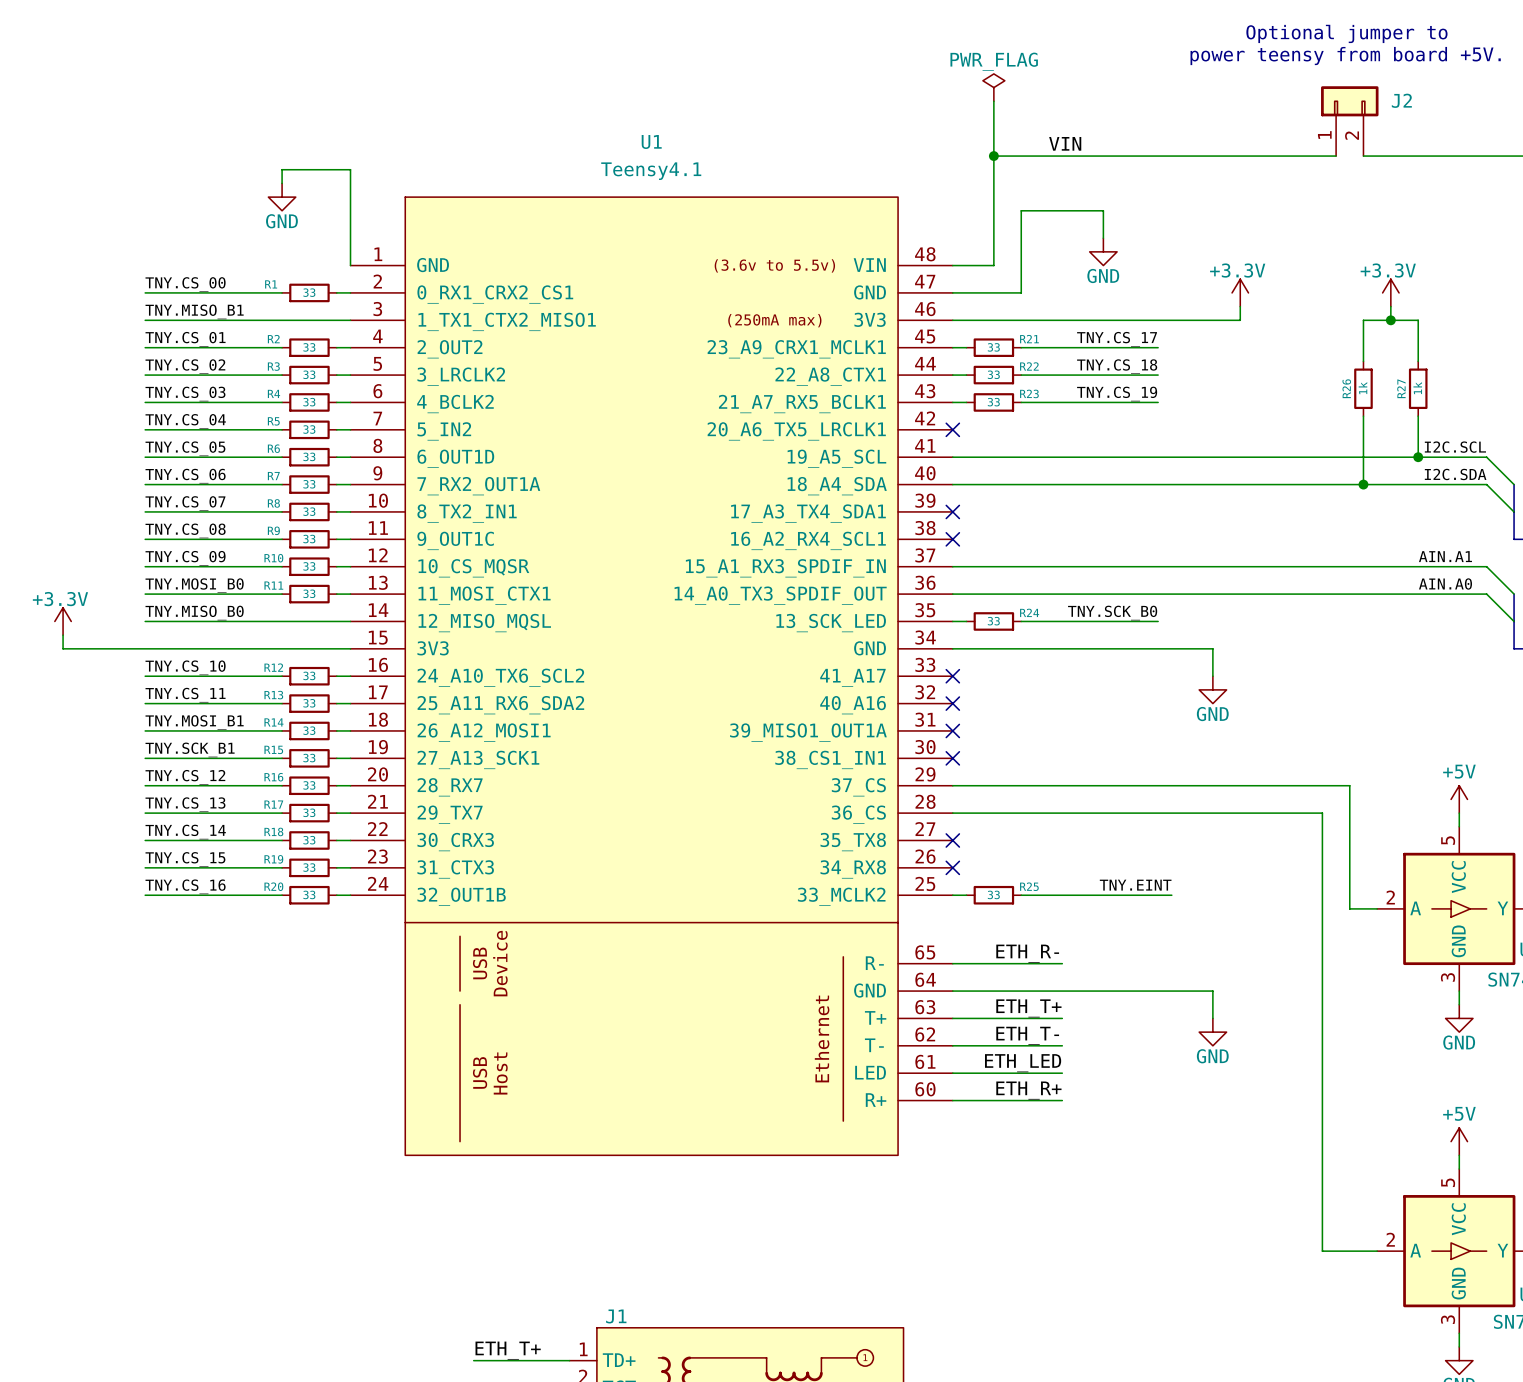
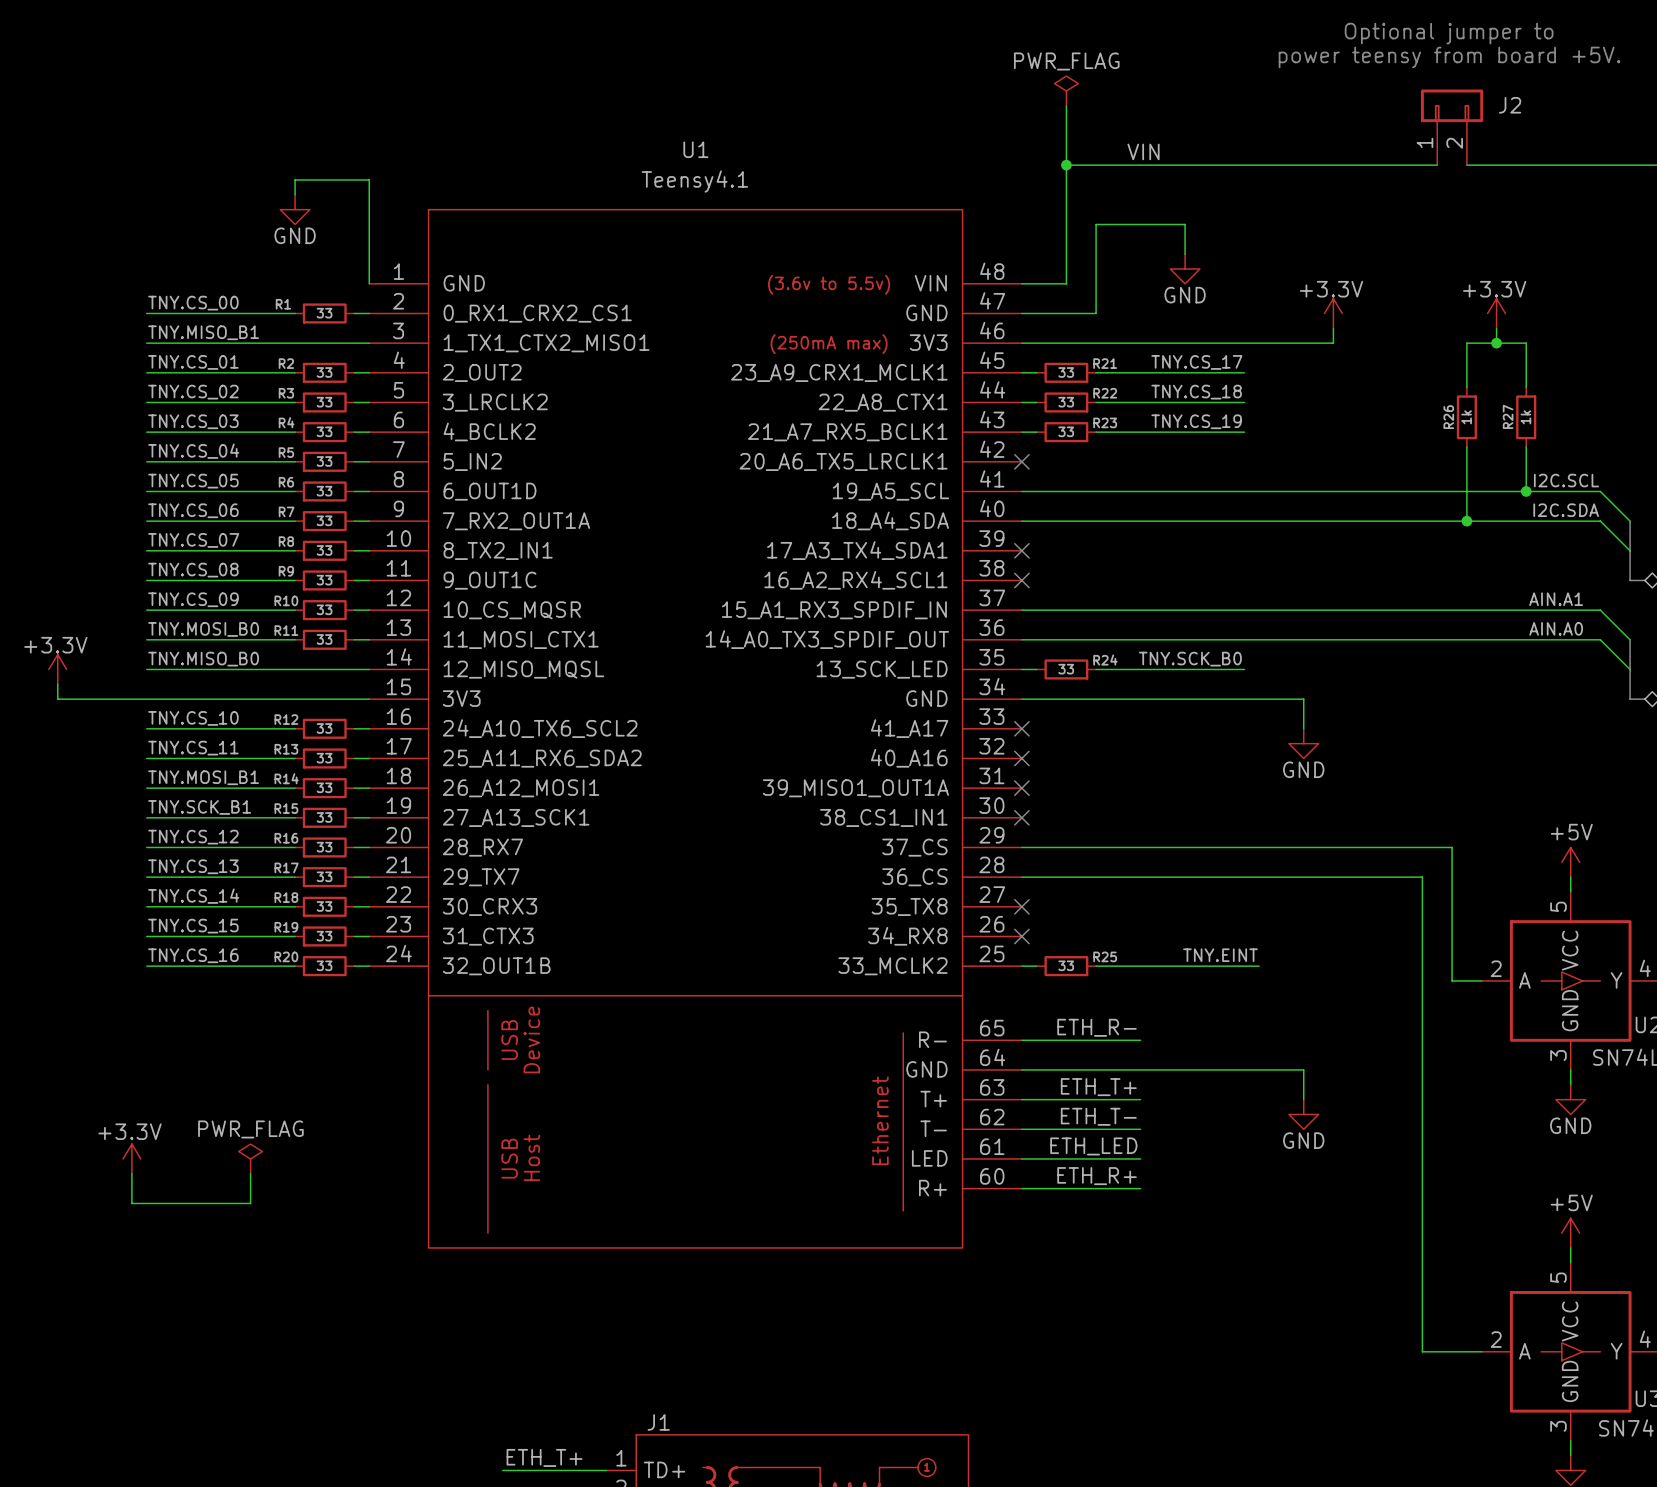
power symbol: none -> +3.3V (131, 1158)
power symbol: none -> PWR_FLAG (250, 1158)
wire: none -> (131, 1173) (131, 1203) (250, 1203) (250, 1173)

